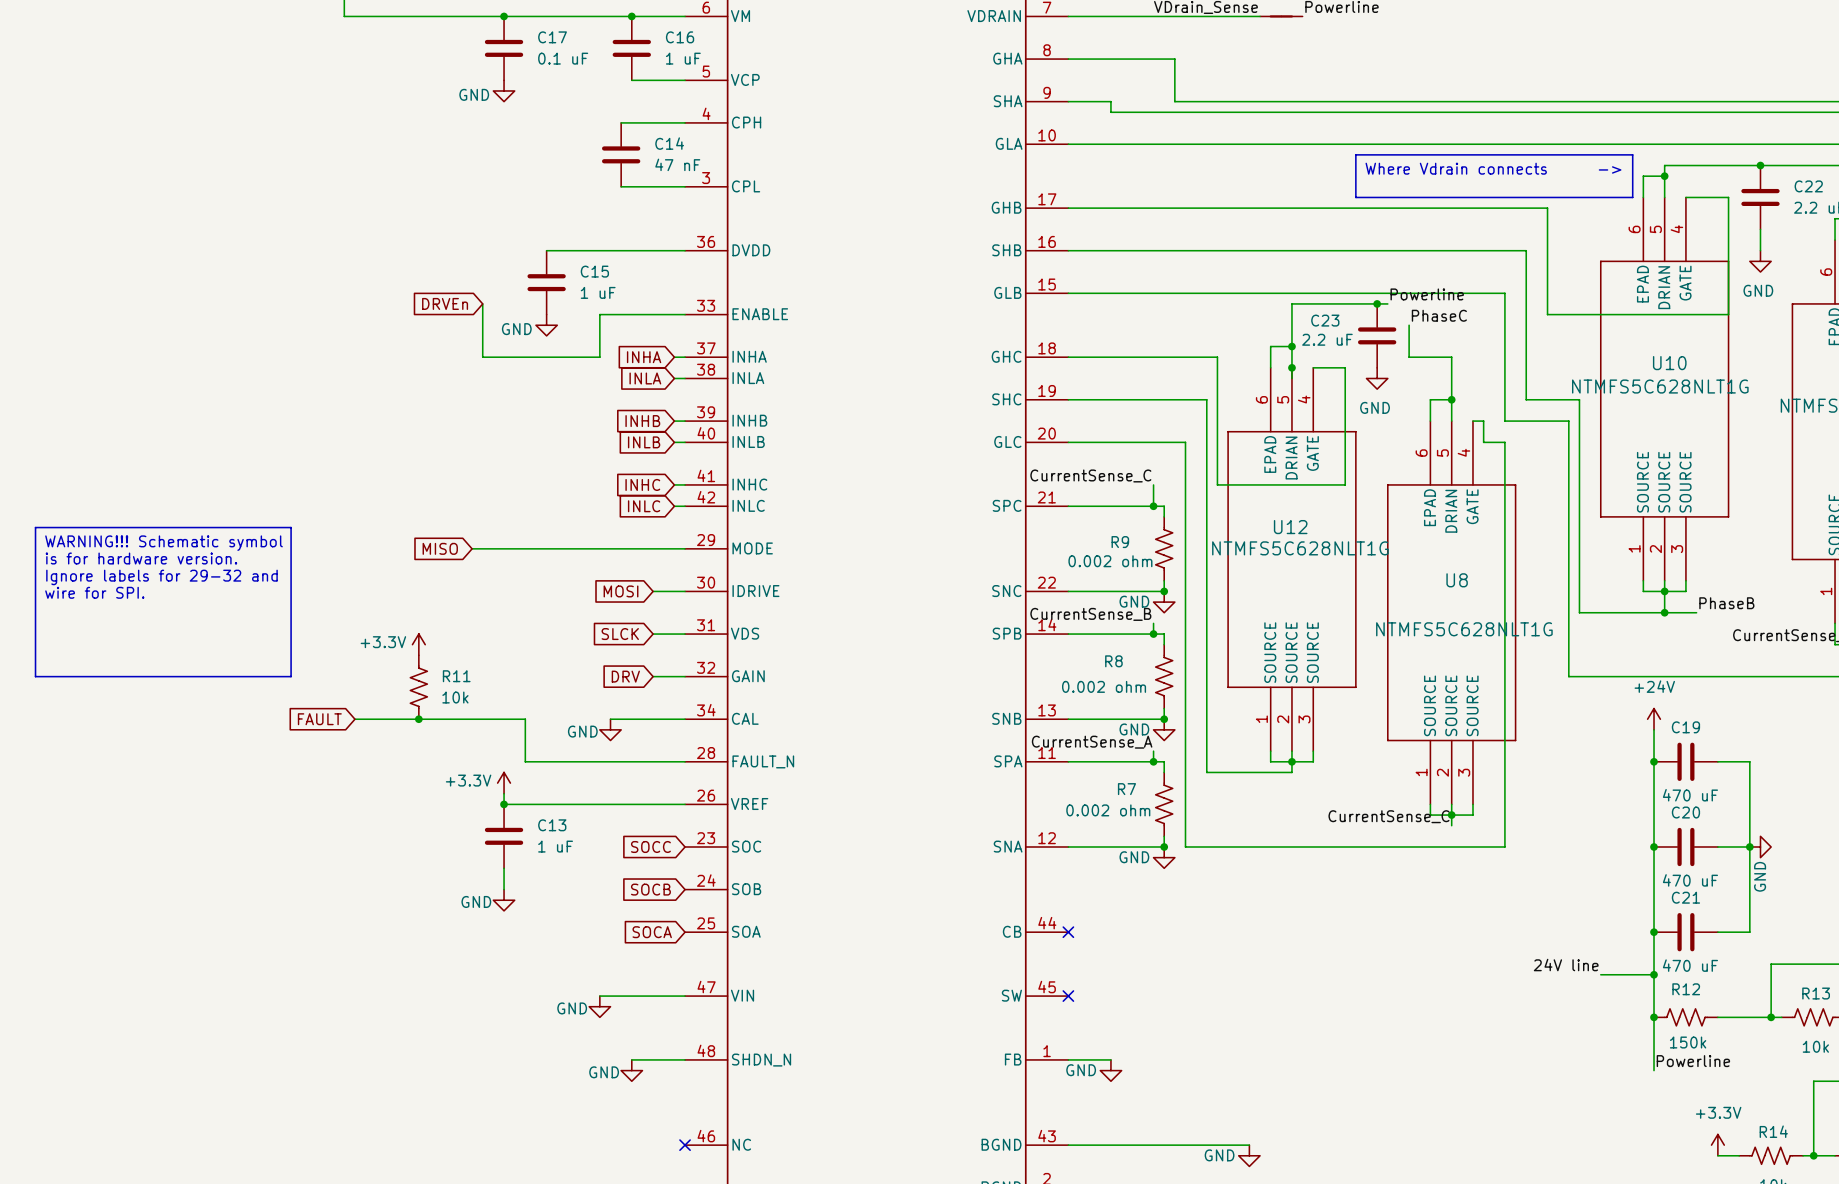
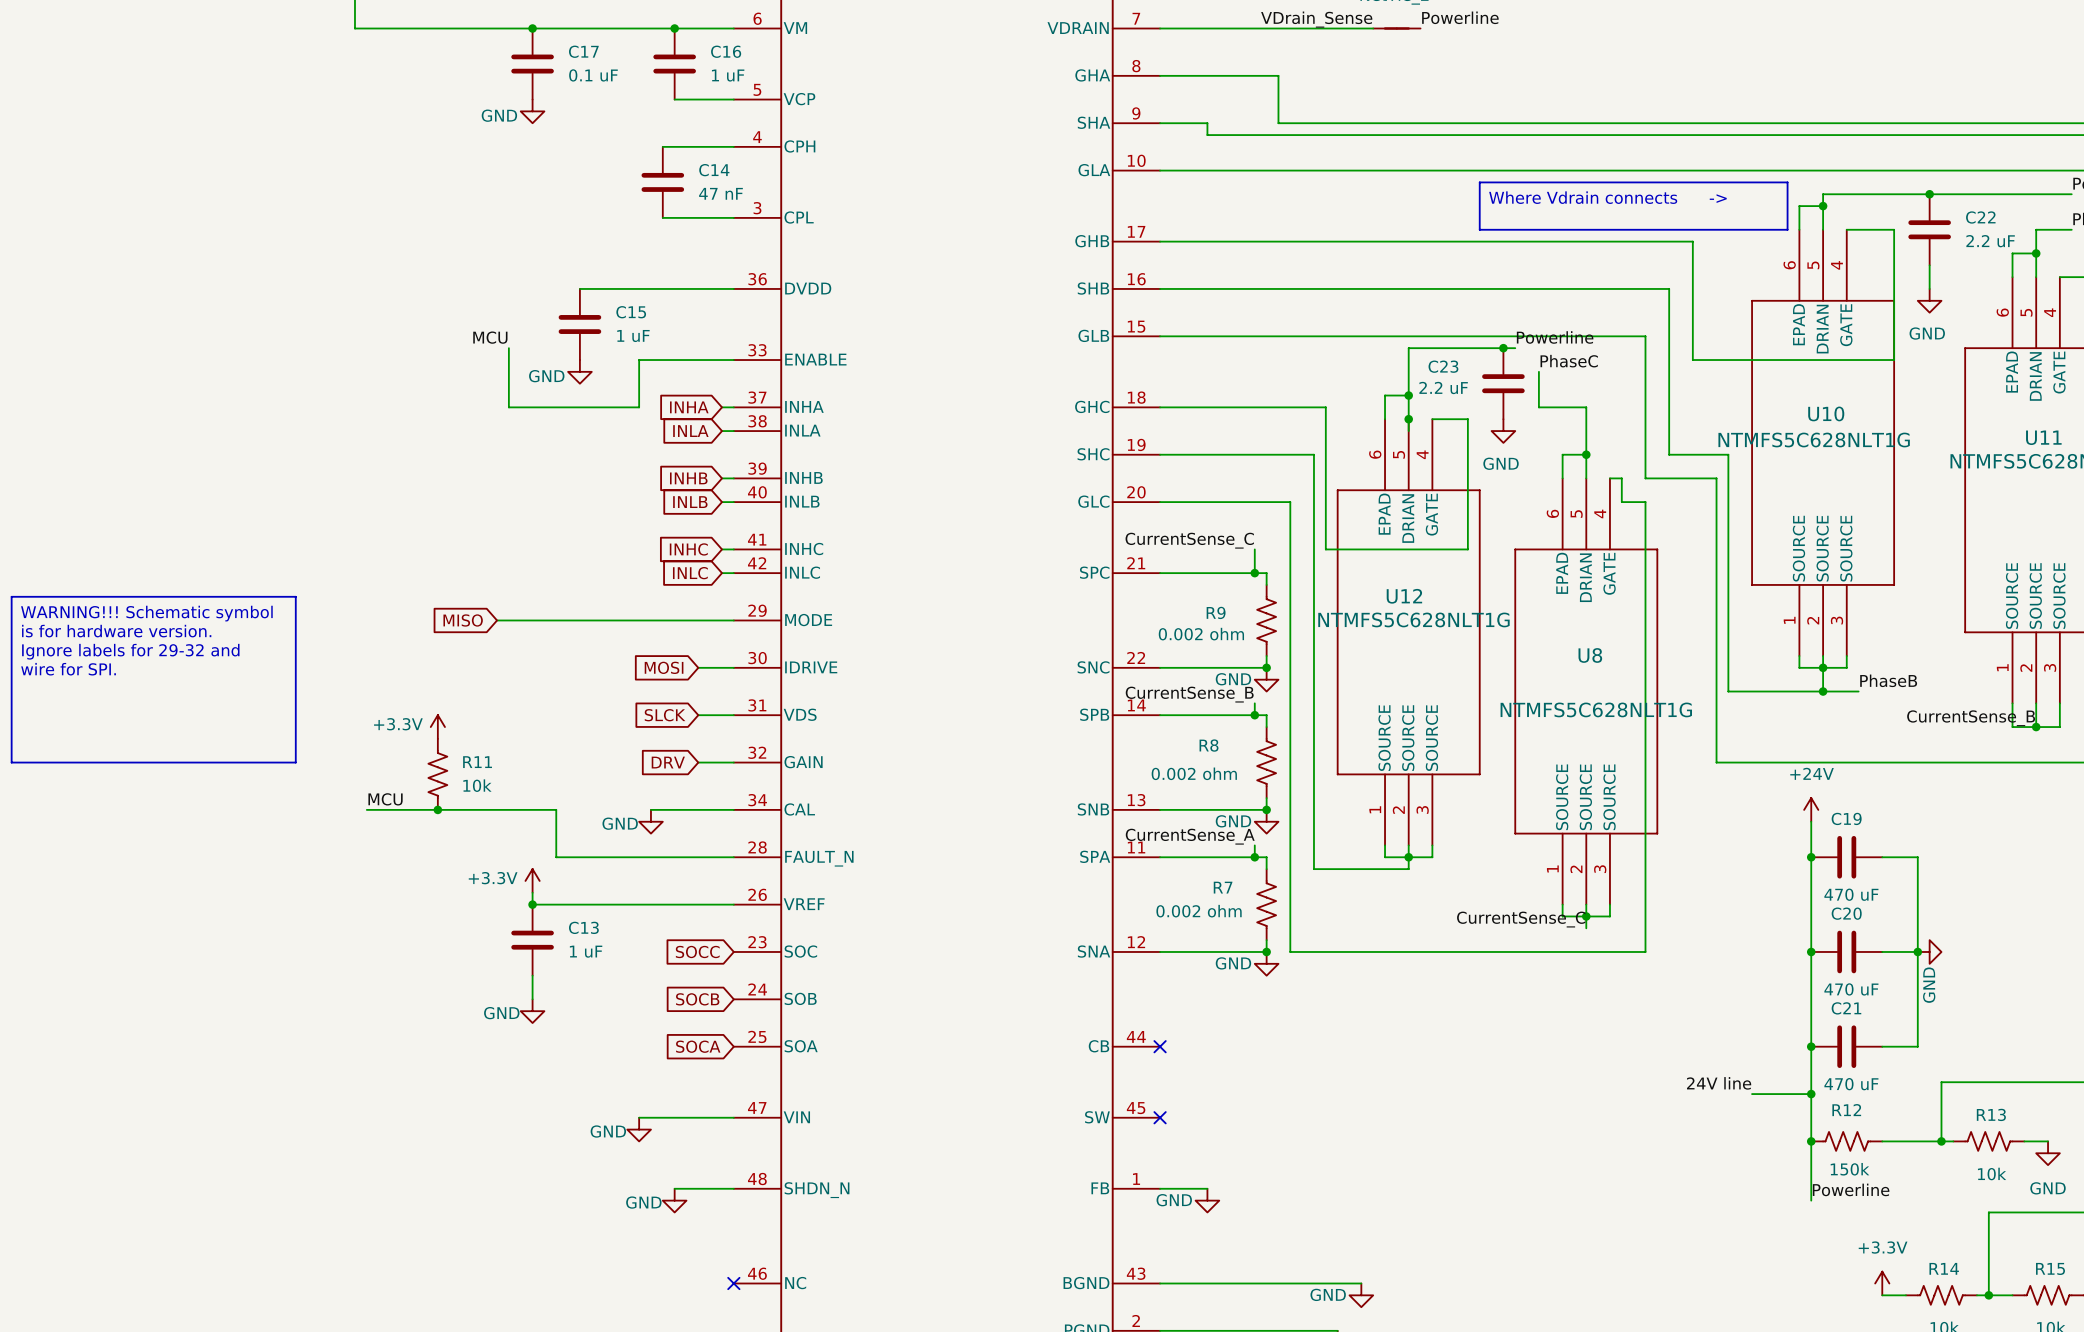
label: none -> MCU (490, 337)
global label: DRVEn (445, 303) -> none
label: none -> MCU (385, 799)
global label: FAULT (319, 719) -> none

